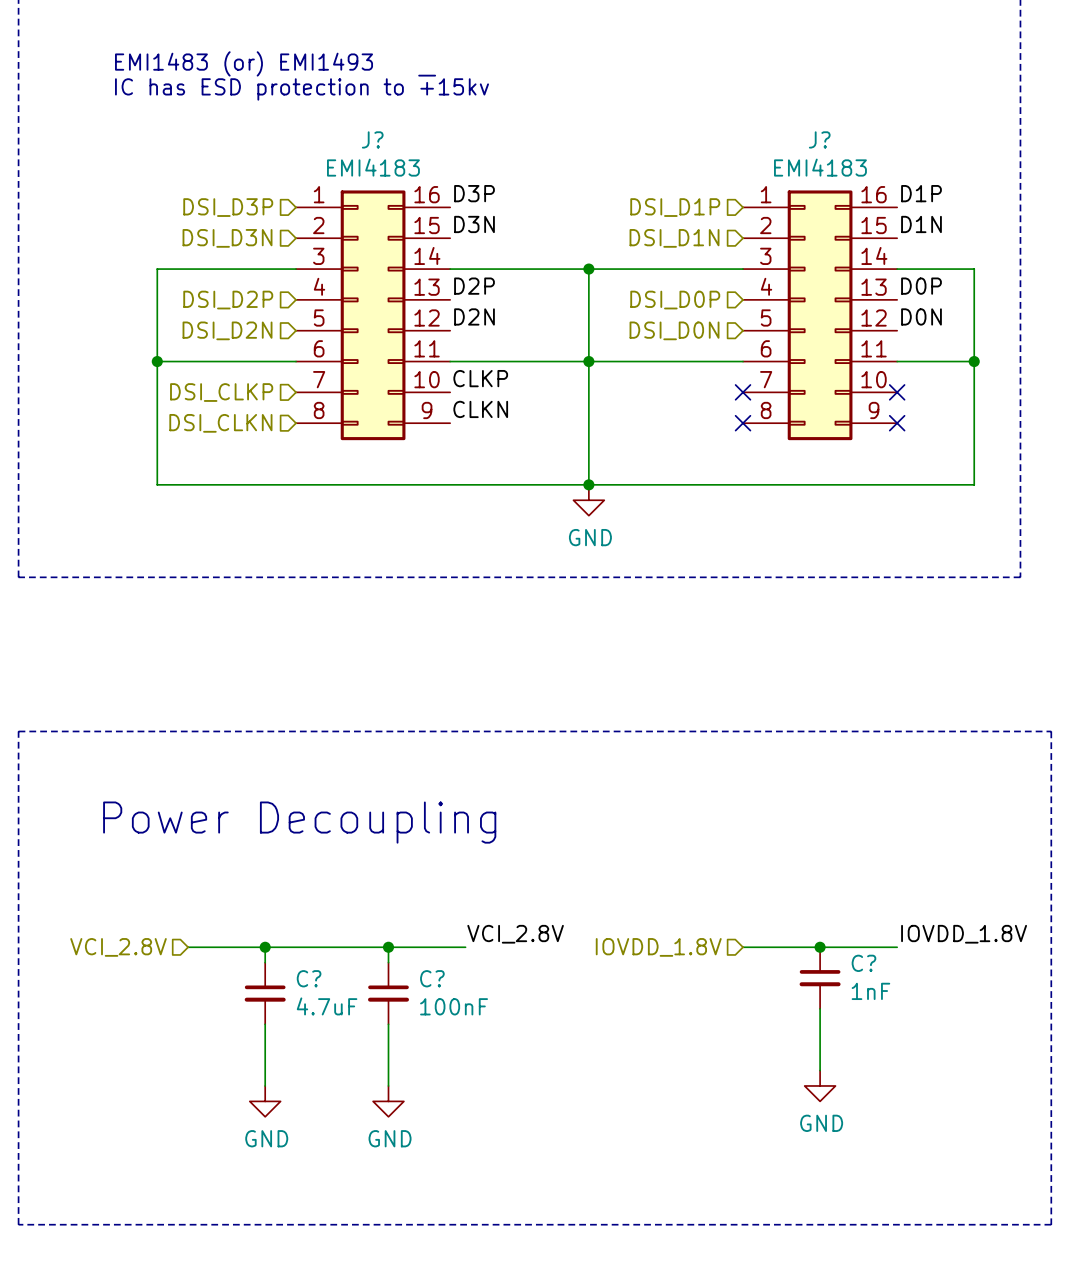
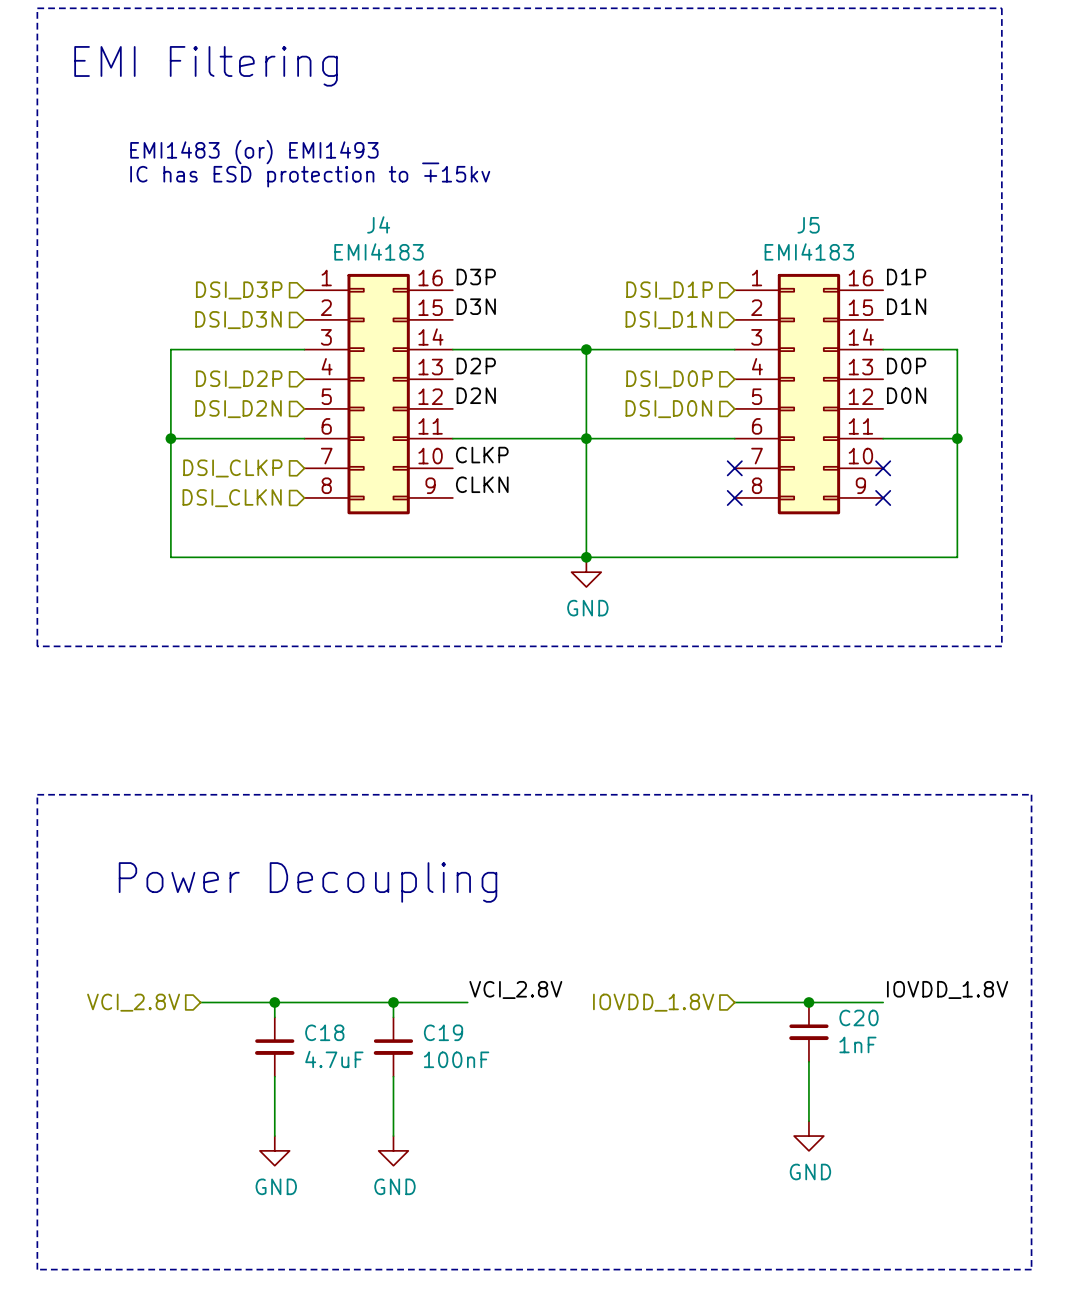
J? name: J? (372, 139) -> J4 (378, 224)
J? name: J? (819, 139) -> J5 (808, 225)
C? name: C? (863, 963) -> C20 (858, 1017)
C? name: C? (309, 978) -> C18 (324, 1032)
C? name: C? (432, 978) -> C19 (443, 1032)

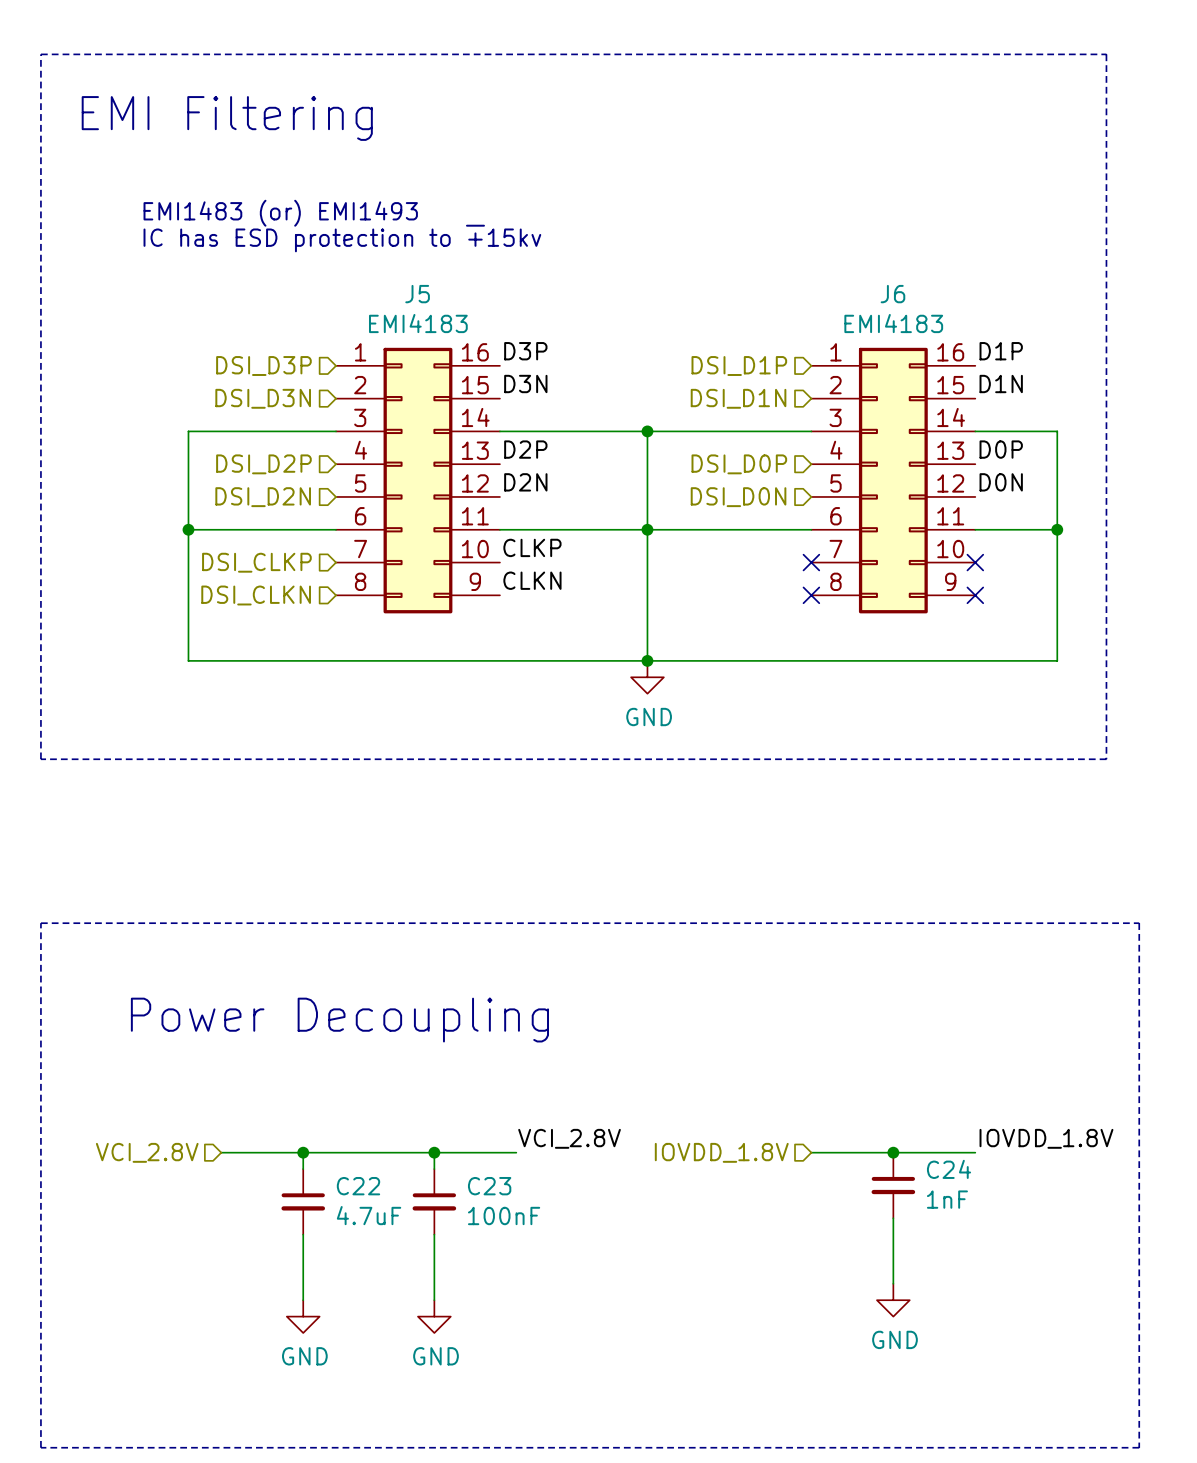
J4 name: J4 (378, 224) -> J5 (417, 294)
J5 name: J5 (808, 225) -> J6 (892, 294)
C20 name: C20 (858, 1017) -> C24 (949, 1169)
C18 name: C18 (324, 1032) -> C22 (358, 1186)
C19 name: C19 (443, 1032) -> C23 (489, 1186)

